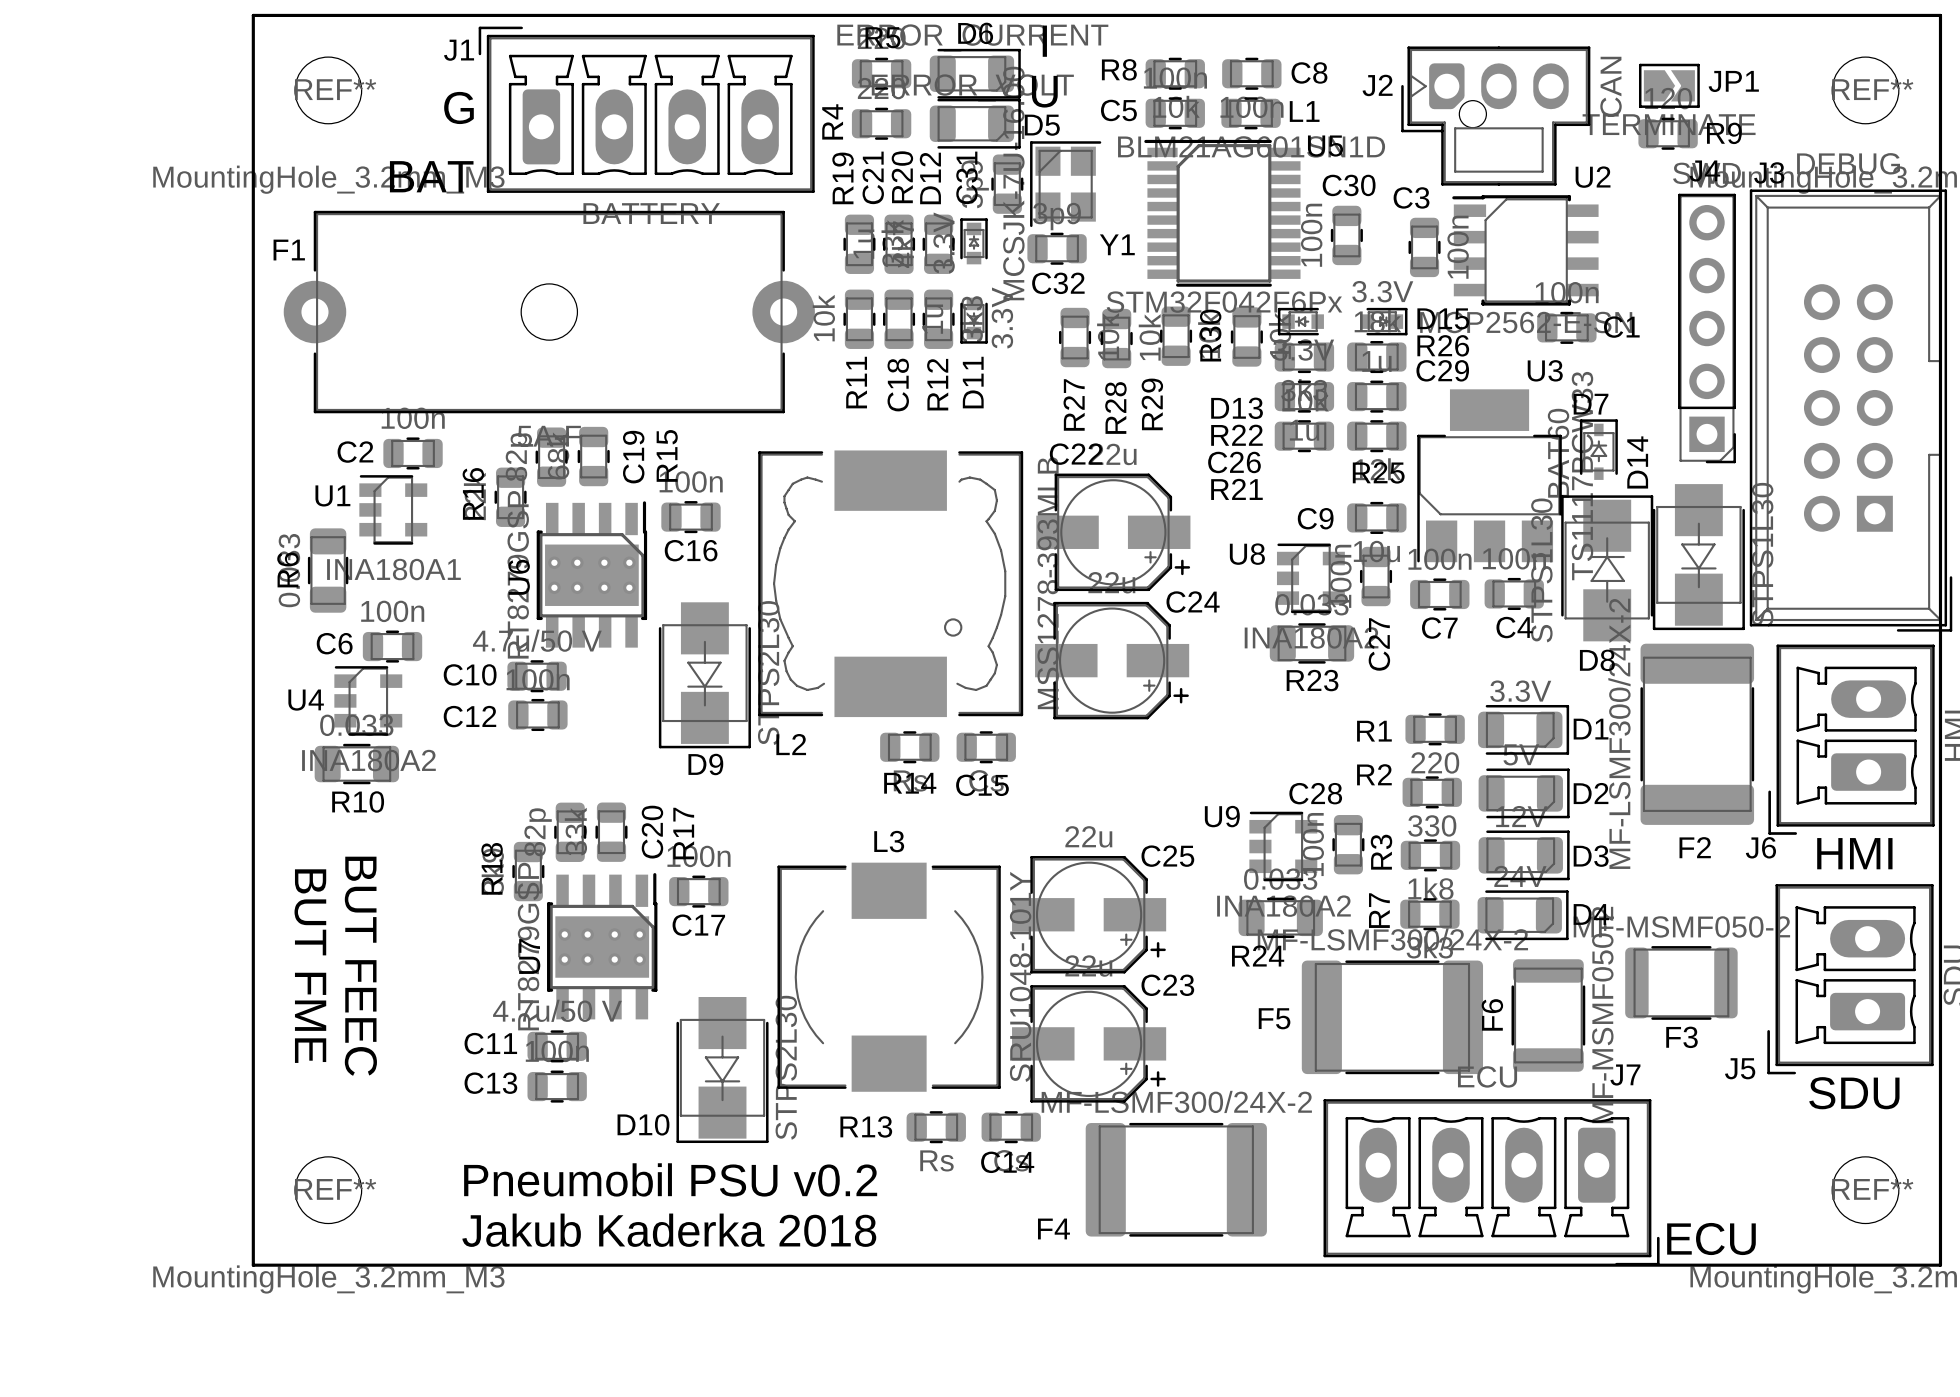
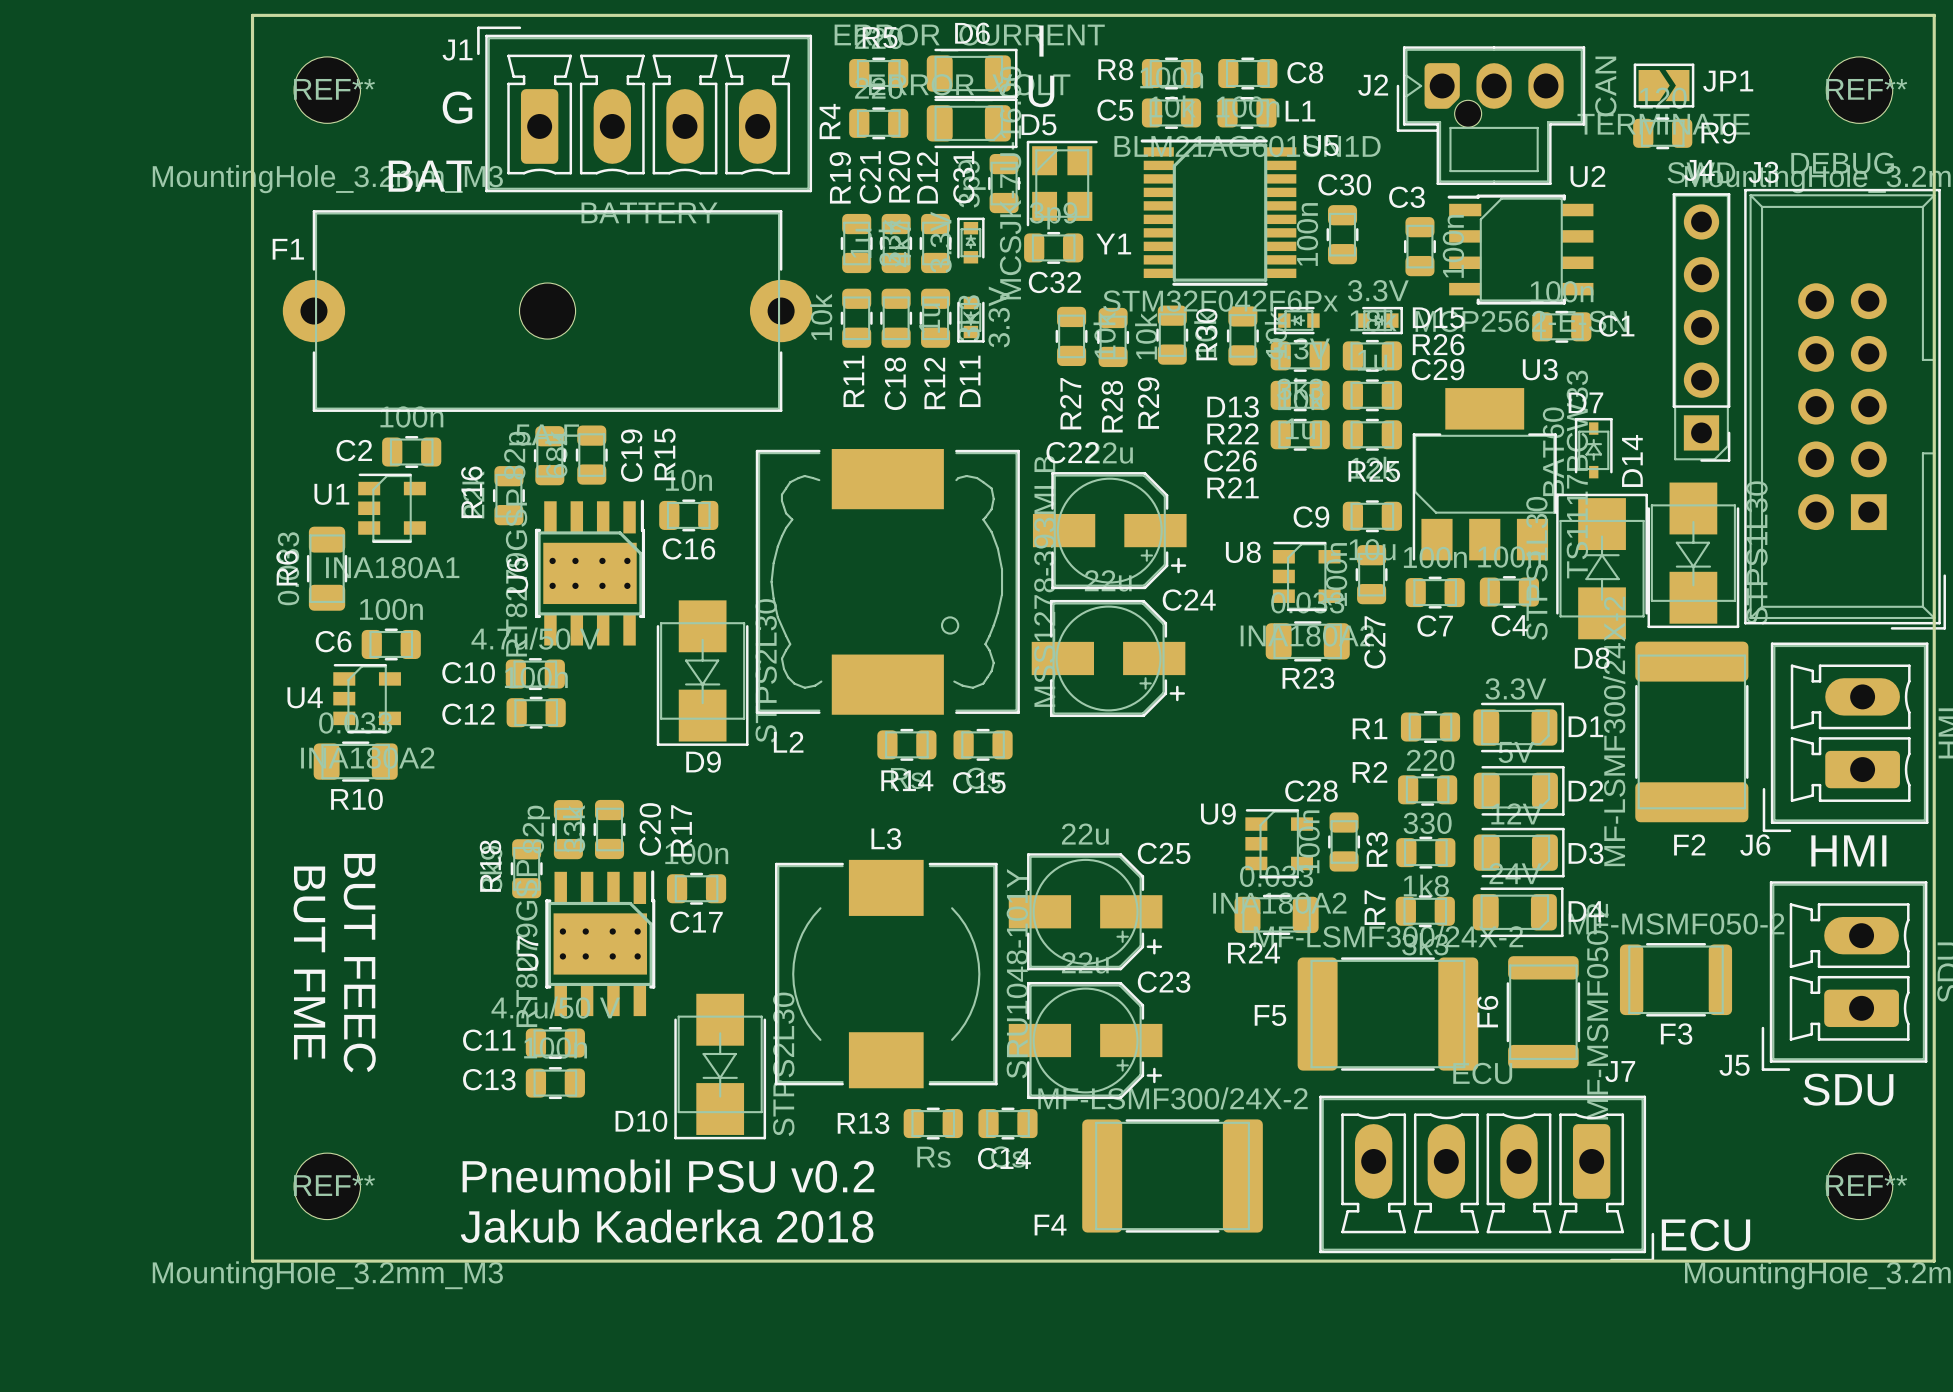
C16 value: 100n (691, 481) -> 10n (688, 480)

